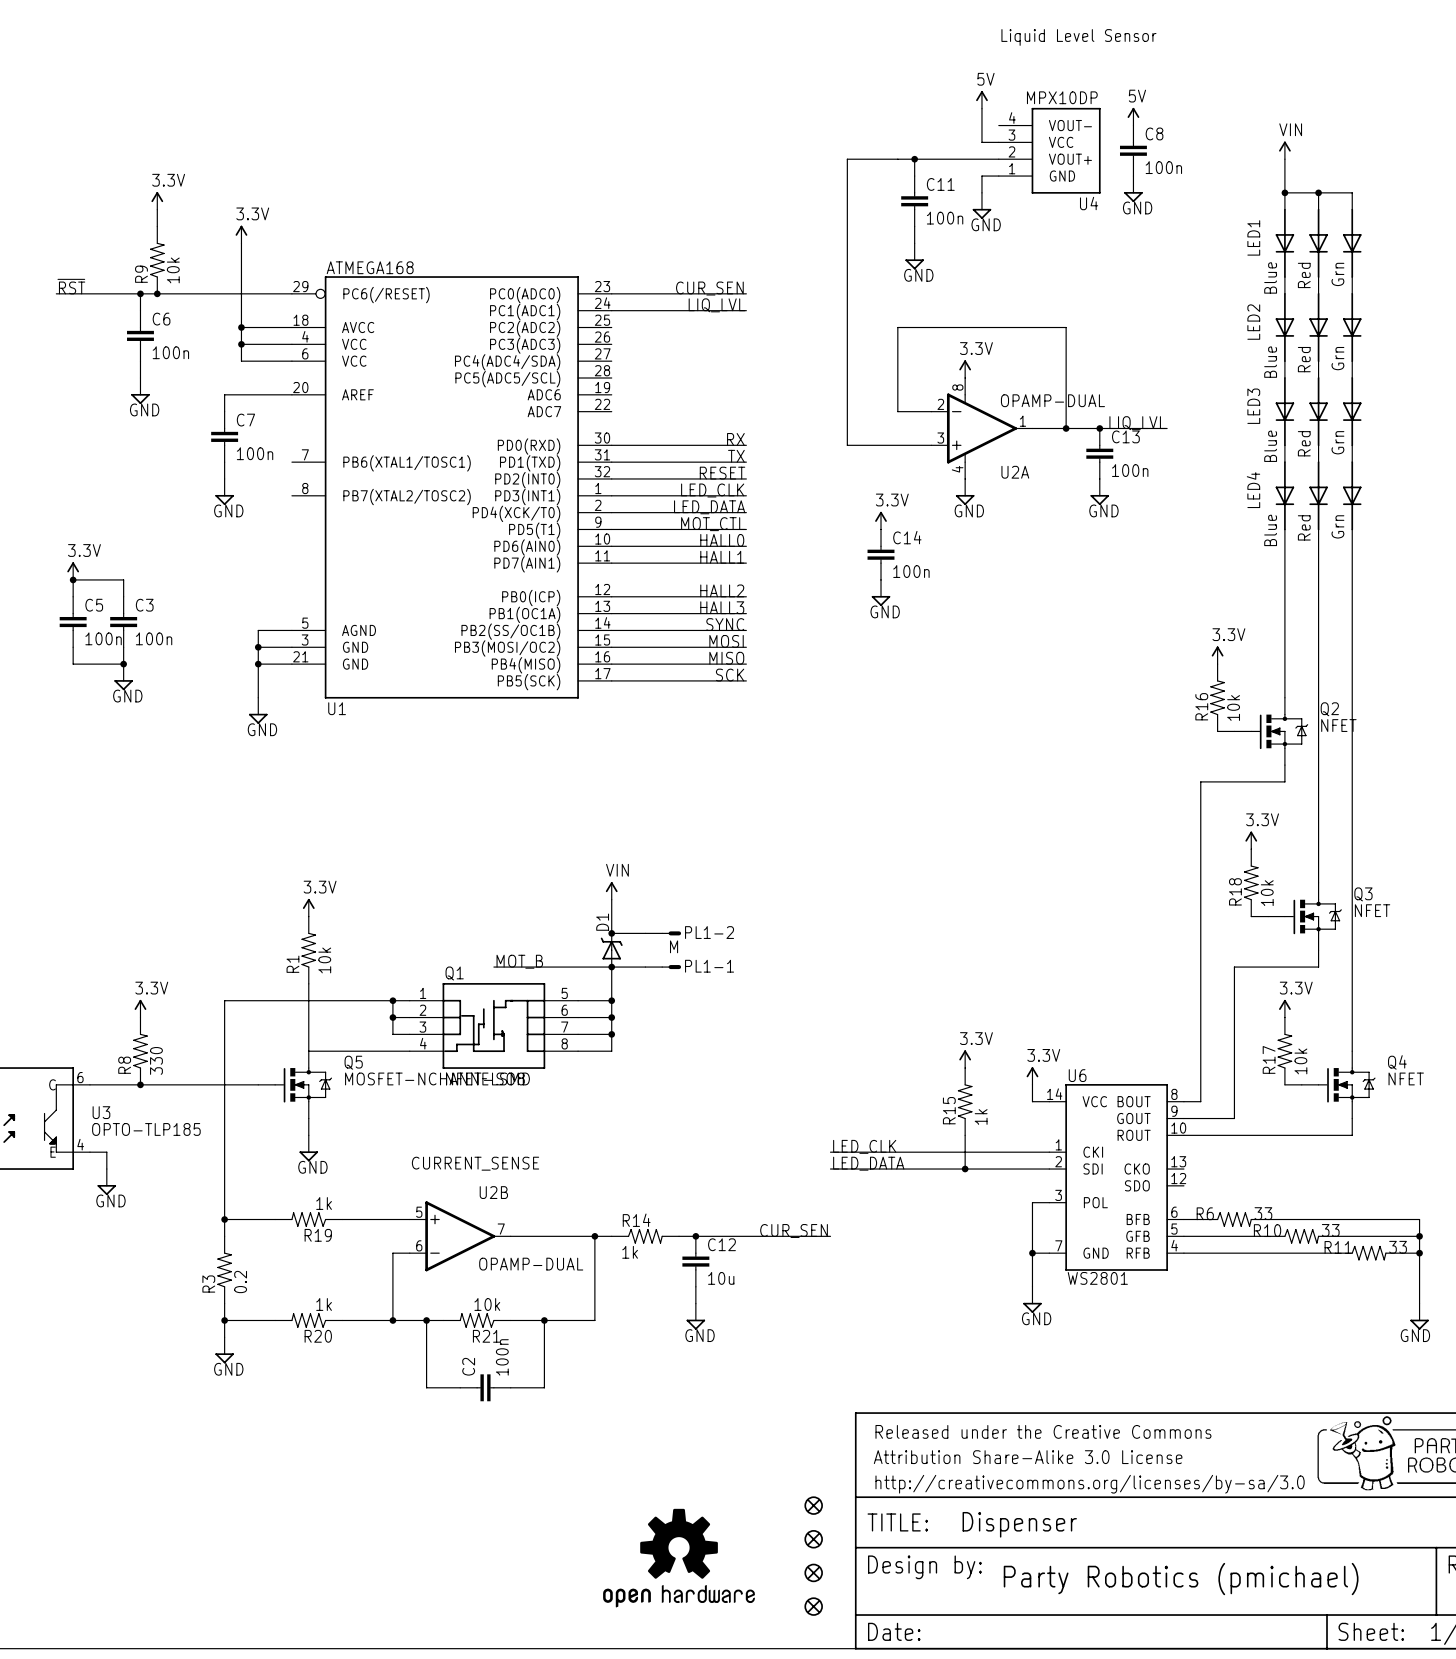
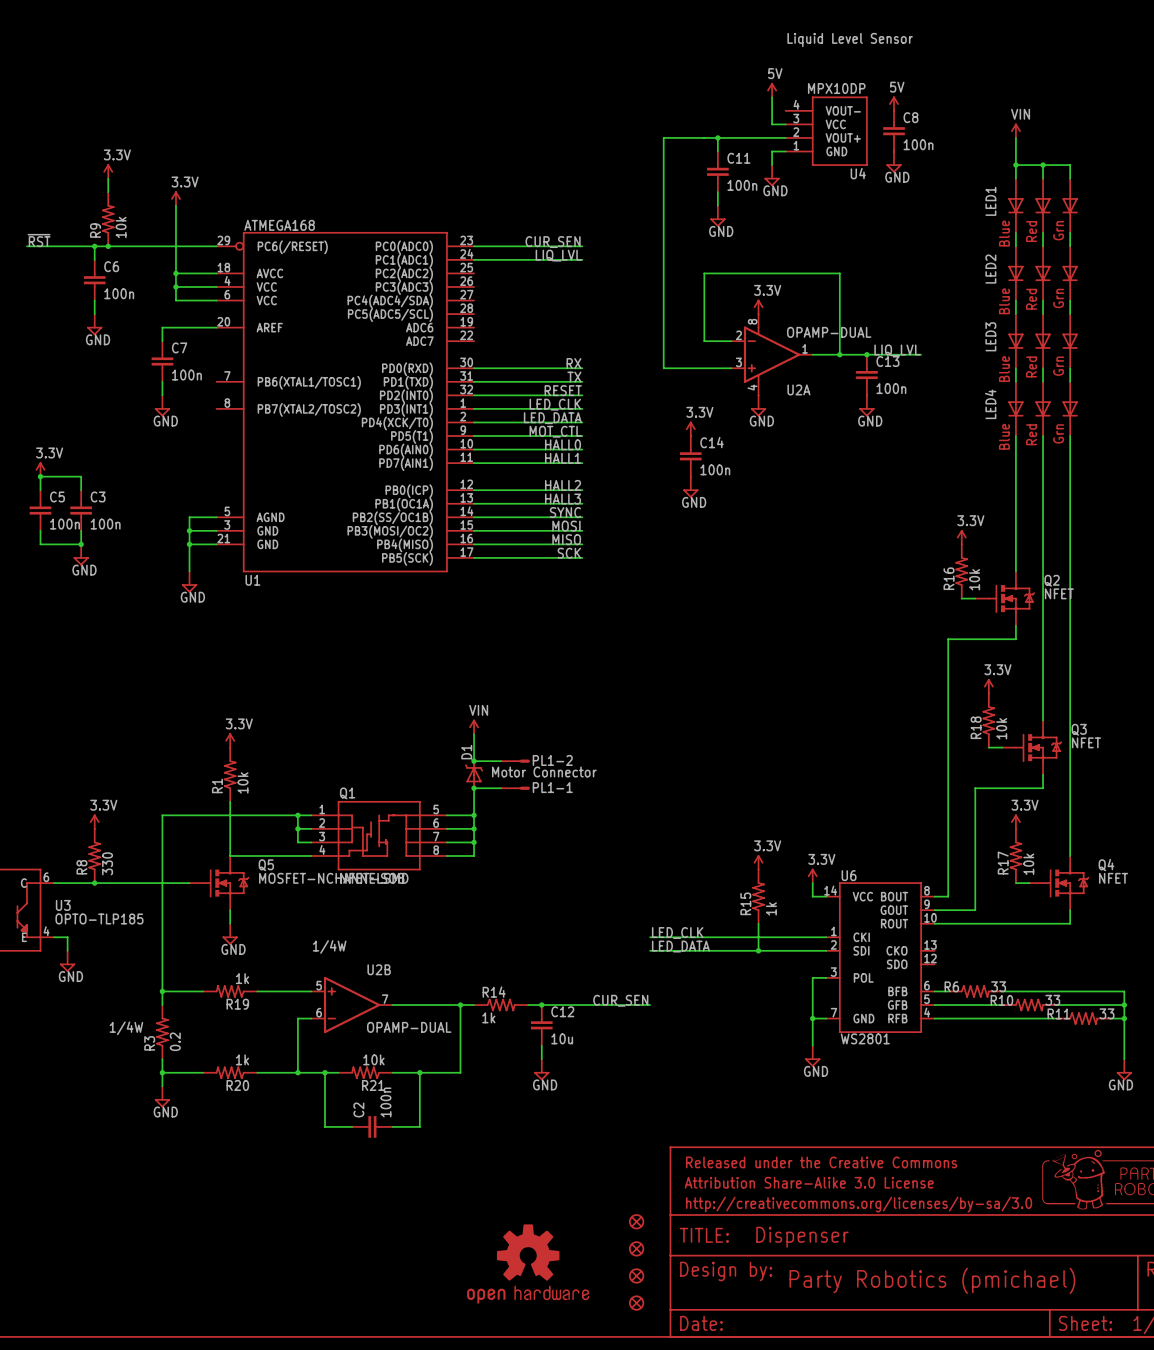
PL1-1 value: M (674, 946) -> Motor Connector (544, 771)
label: MOT_B (519, 961) -> none
wire: (493, 967) (611, 967) -> none
label: CURRENT_SENSE (475, 1163) -> 1/4W (329, 946)
label: none -> 1/4W (126, 1028)

